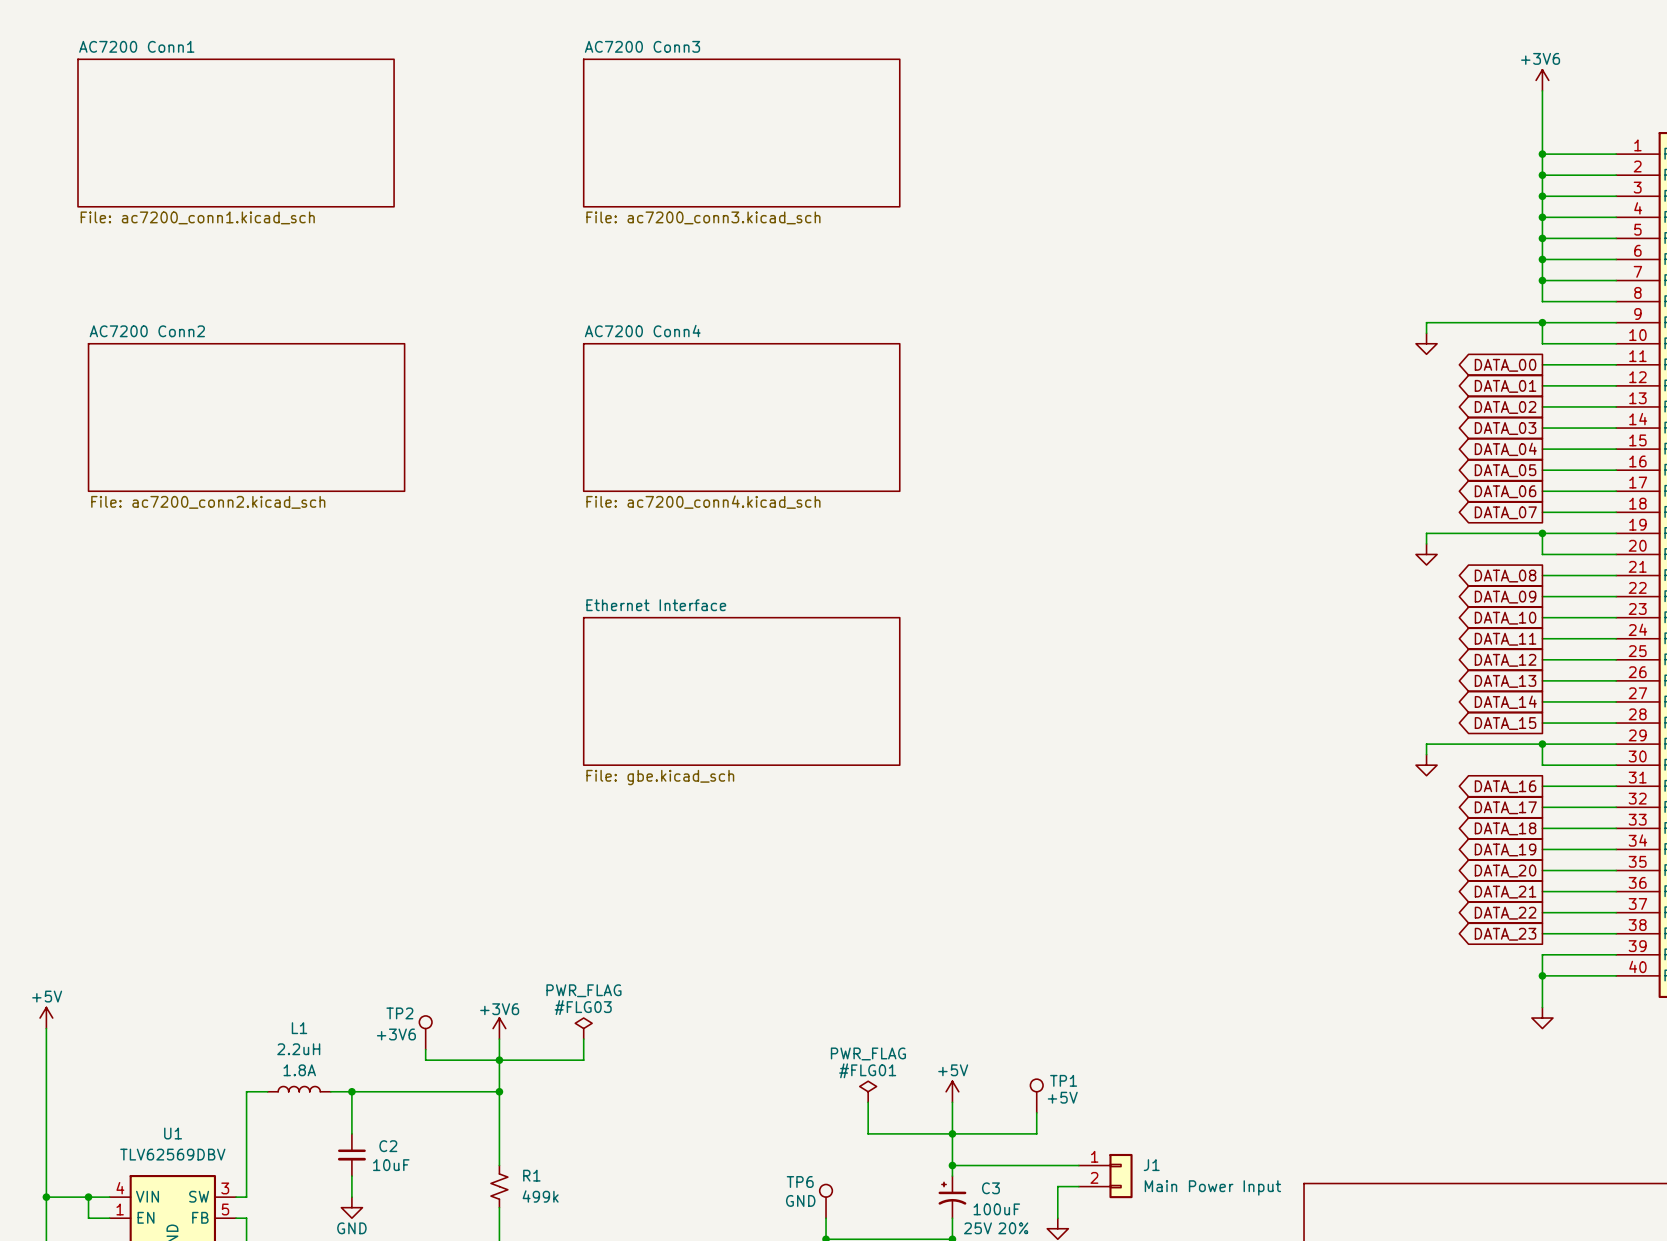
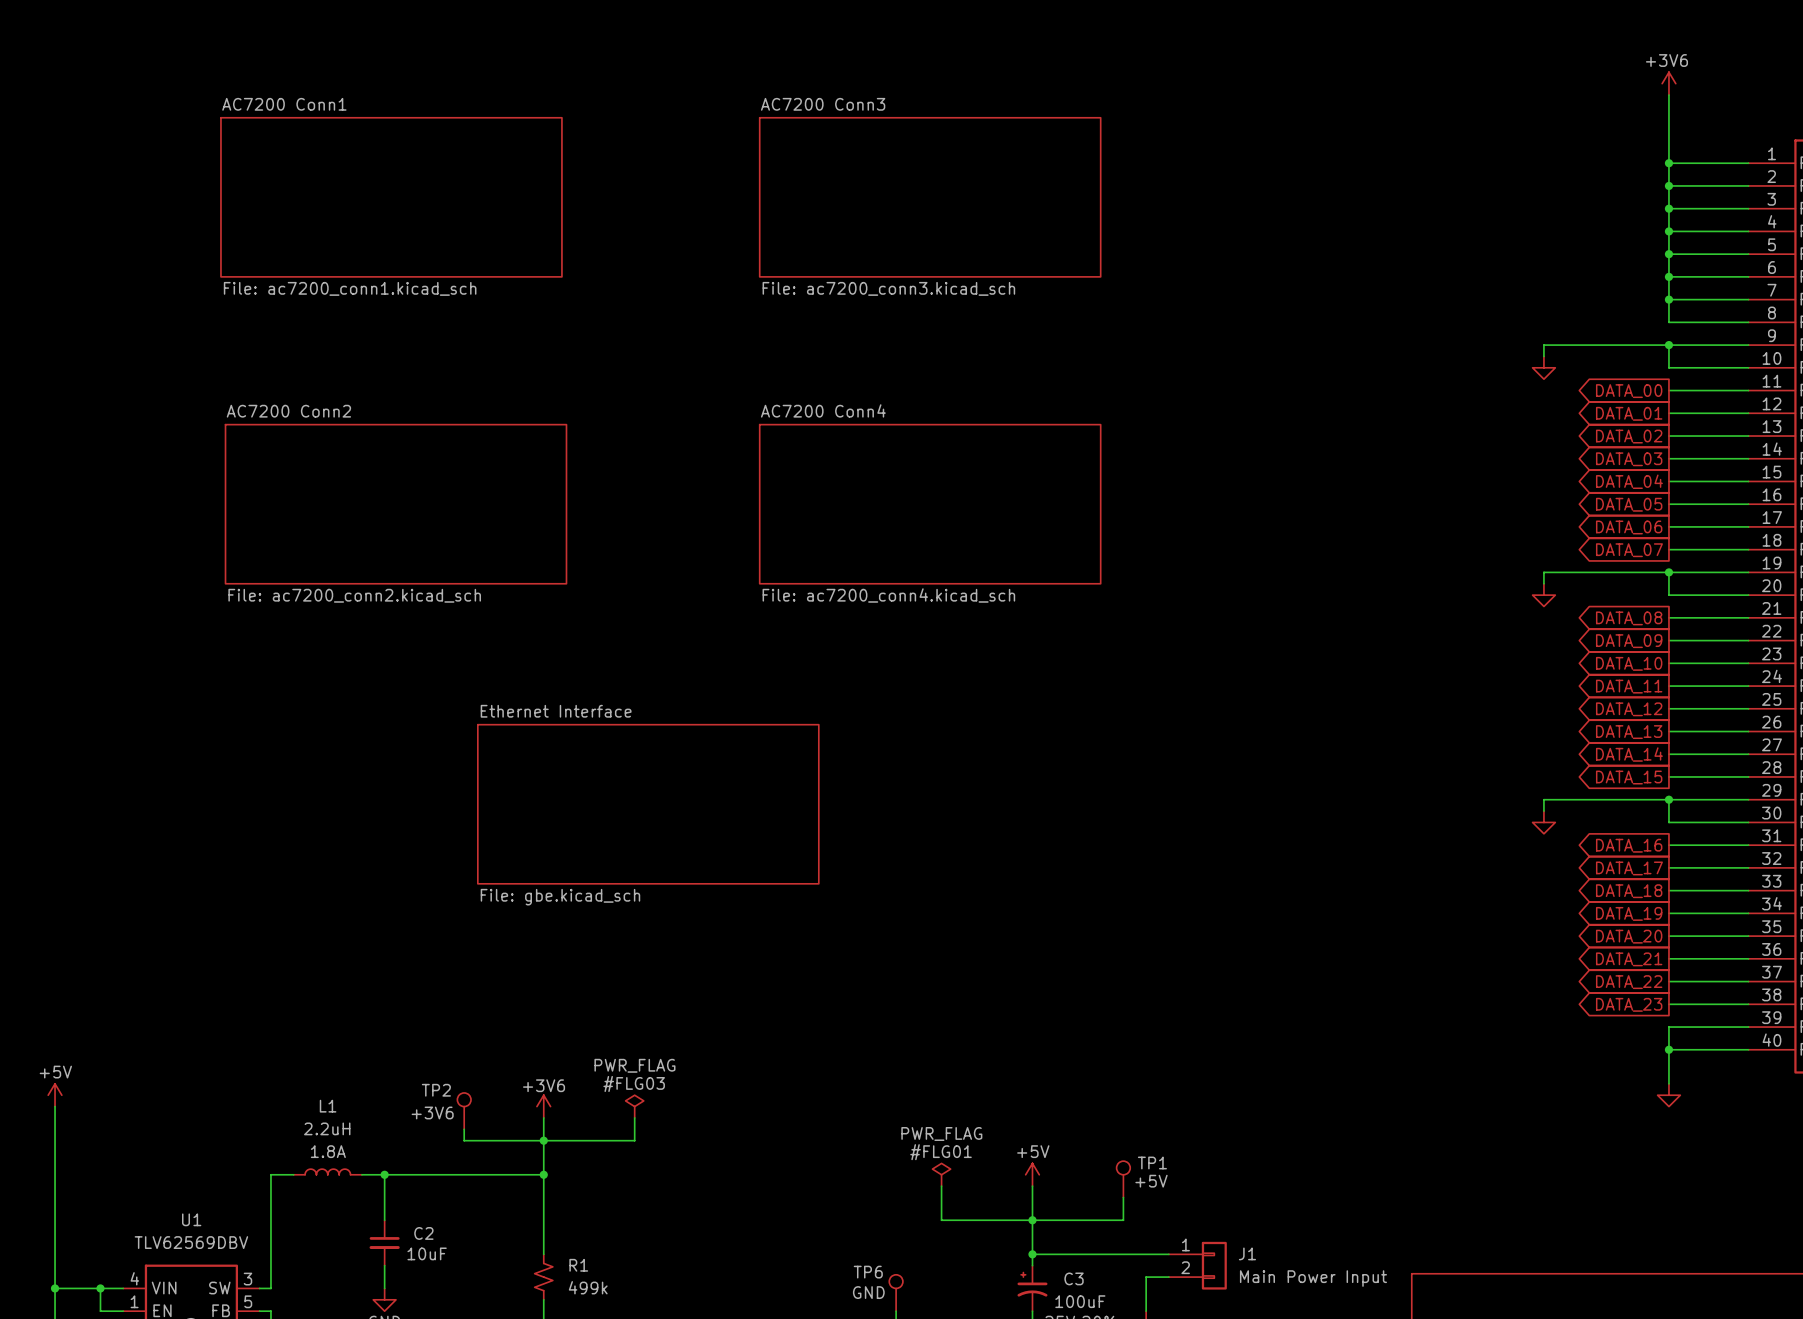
sheet AC7200 Conn1 position: (236, 133) -> (391, 197)
sheet AC7200 Conn3 position: (741, 133) -> (930, 197)
sheet AC7200 Conn2 position: (246, 417) -> (396, 504)
sheet AC7200 Conn4 position: (741, 417) -> (930, 504)
sheet Ethernet Interface position: (741, 691) -> (648, 804)

